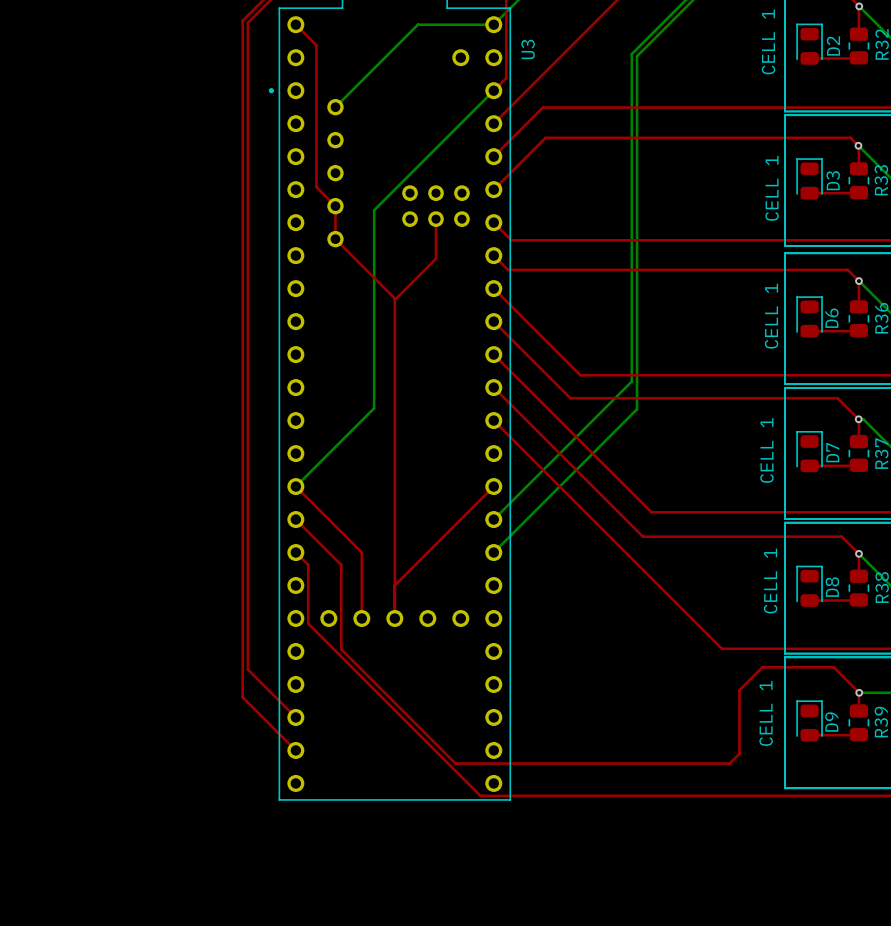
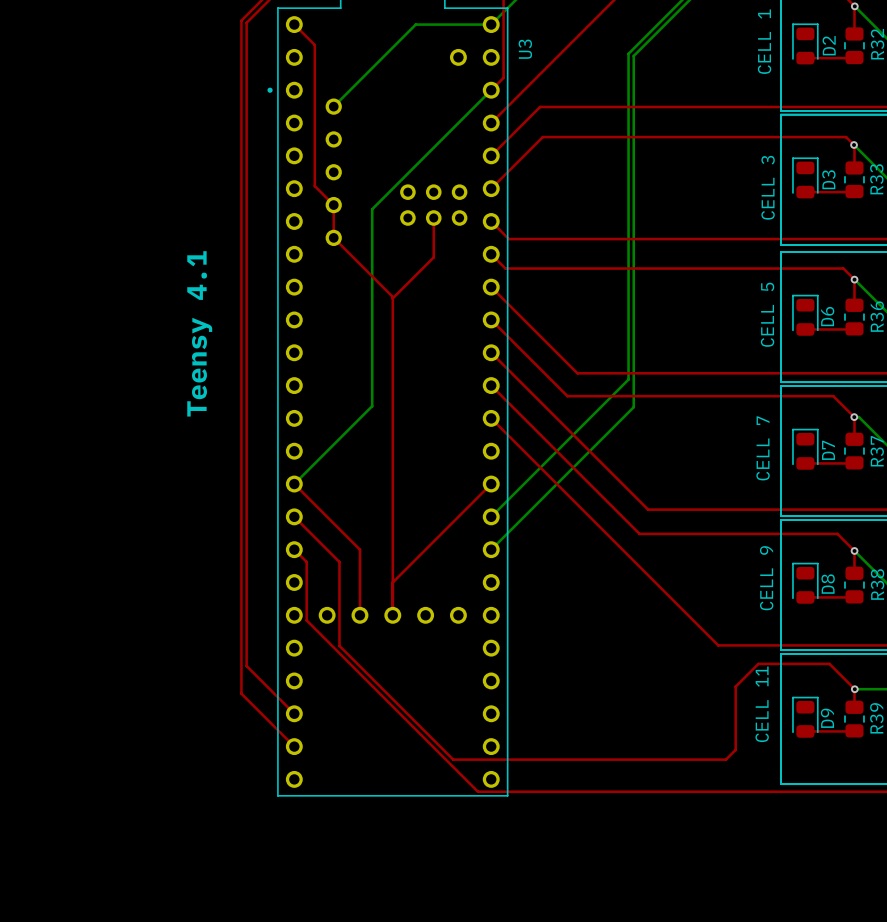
text: CELL 1 (772, 188) -> CELL 3 (768, 187)
text: CELL 1 (771, 316) -> CELL 5 (767, 314)
text: none -> Teensy 4.1 (199, 333)
text: CELL 1 (766, 450) -> CELL 7 (763, 448)
text: CELL 1 (770, 581) -> CELL 9 (766, 578)
text: CELL 1 (766, 713) -> CELL 11 (762, 704)

